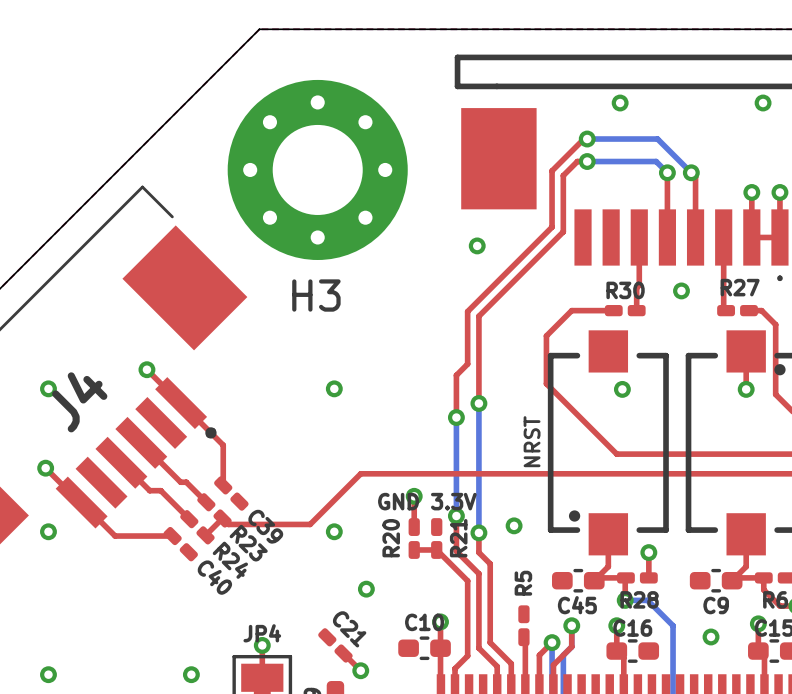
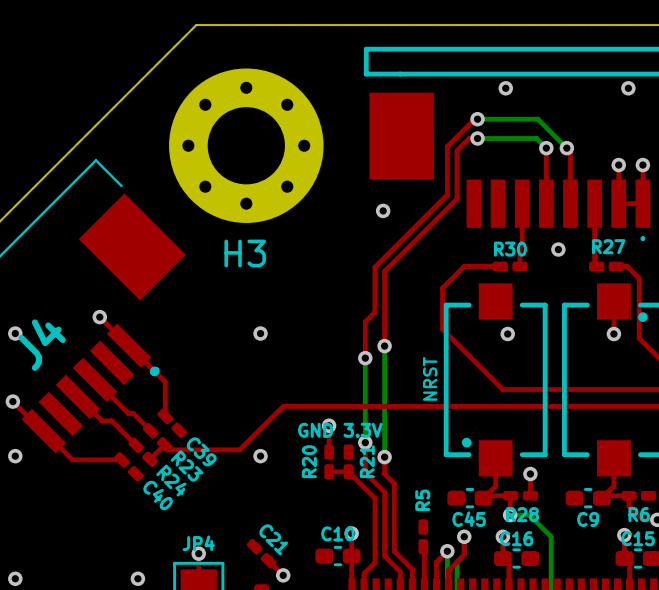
via: (514, 525) -> none
via: (366, 589) -> none
via: (711, 636) -> none

